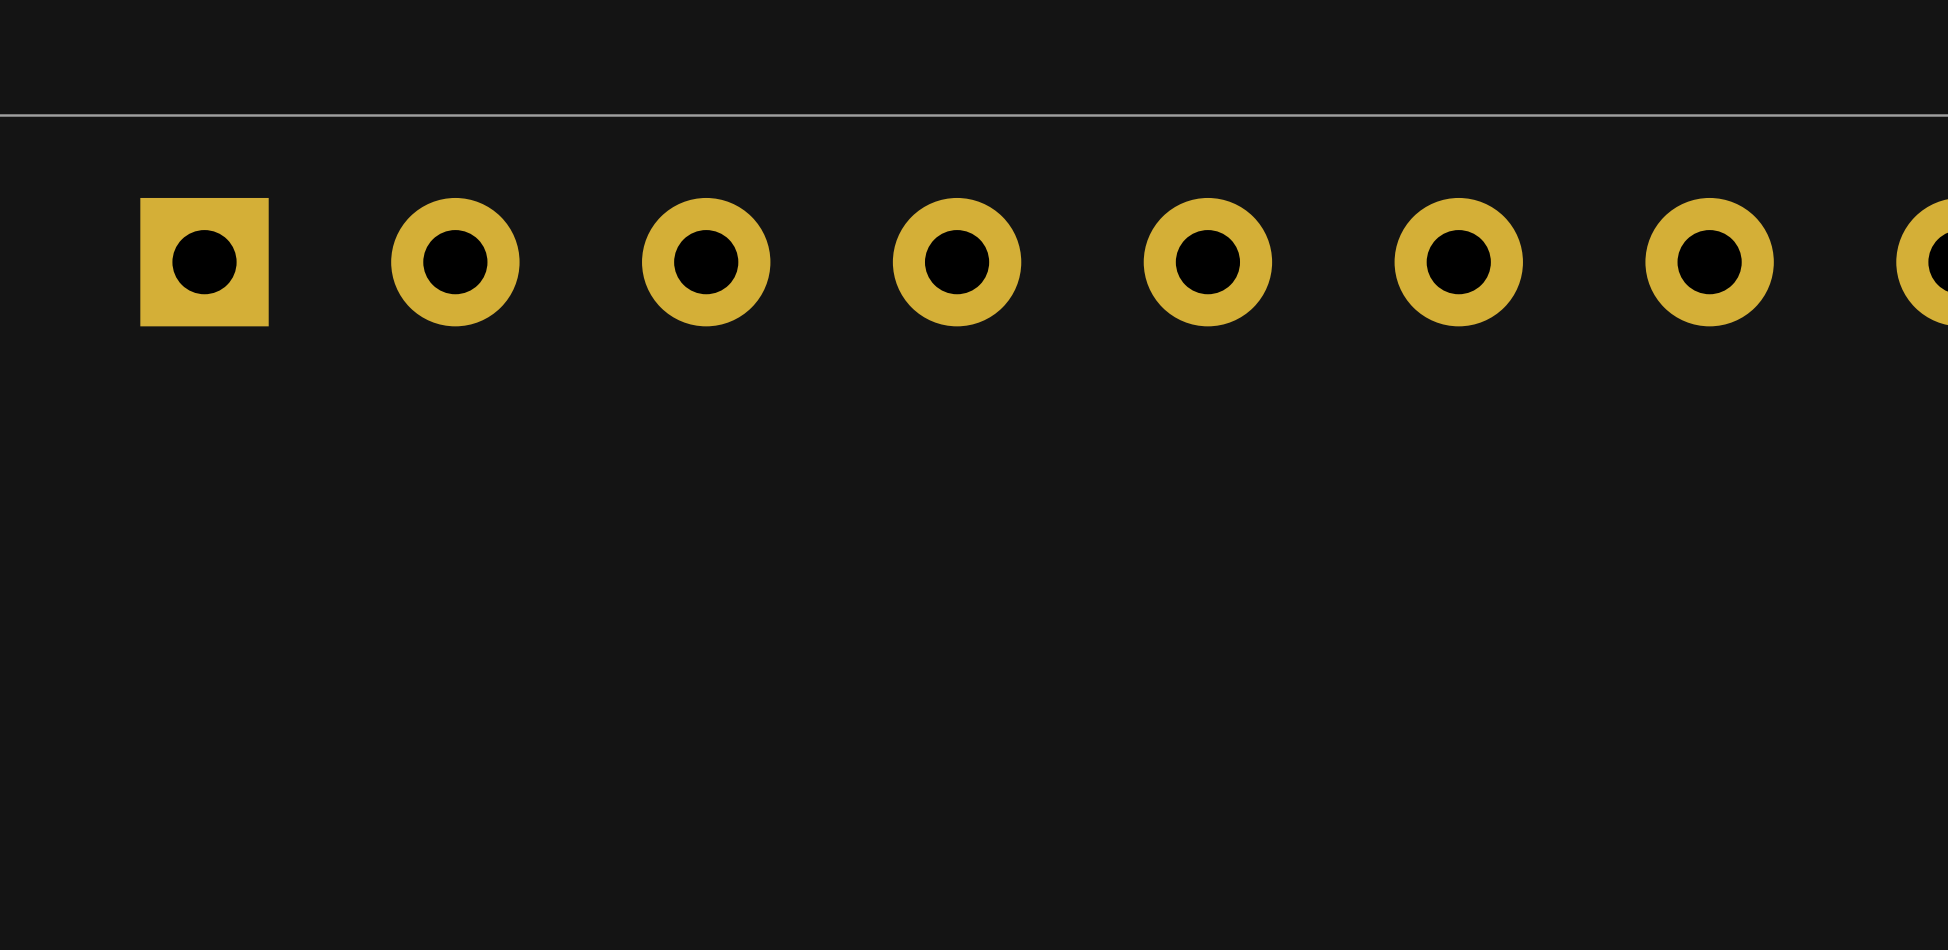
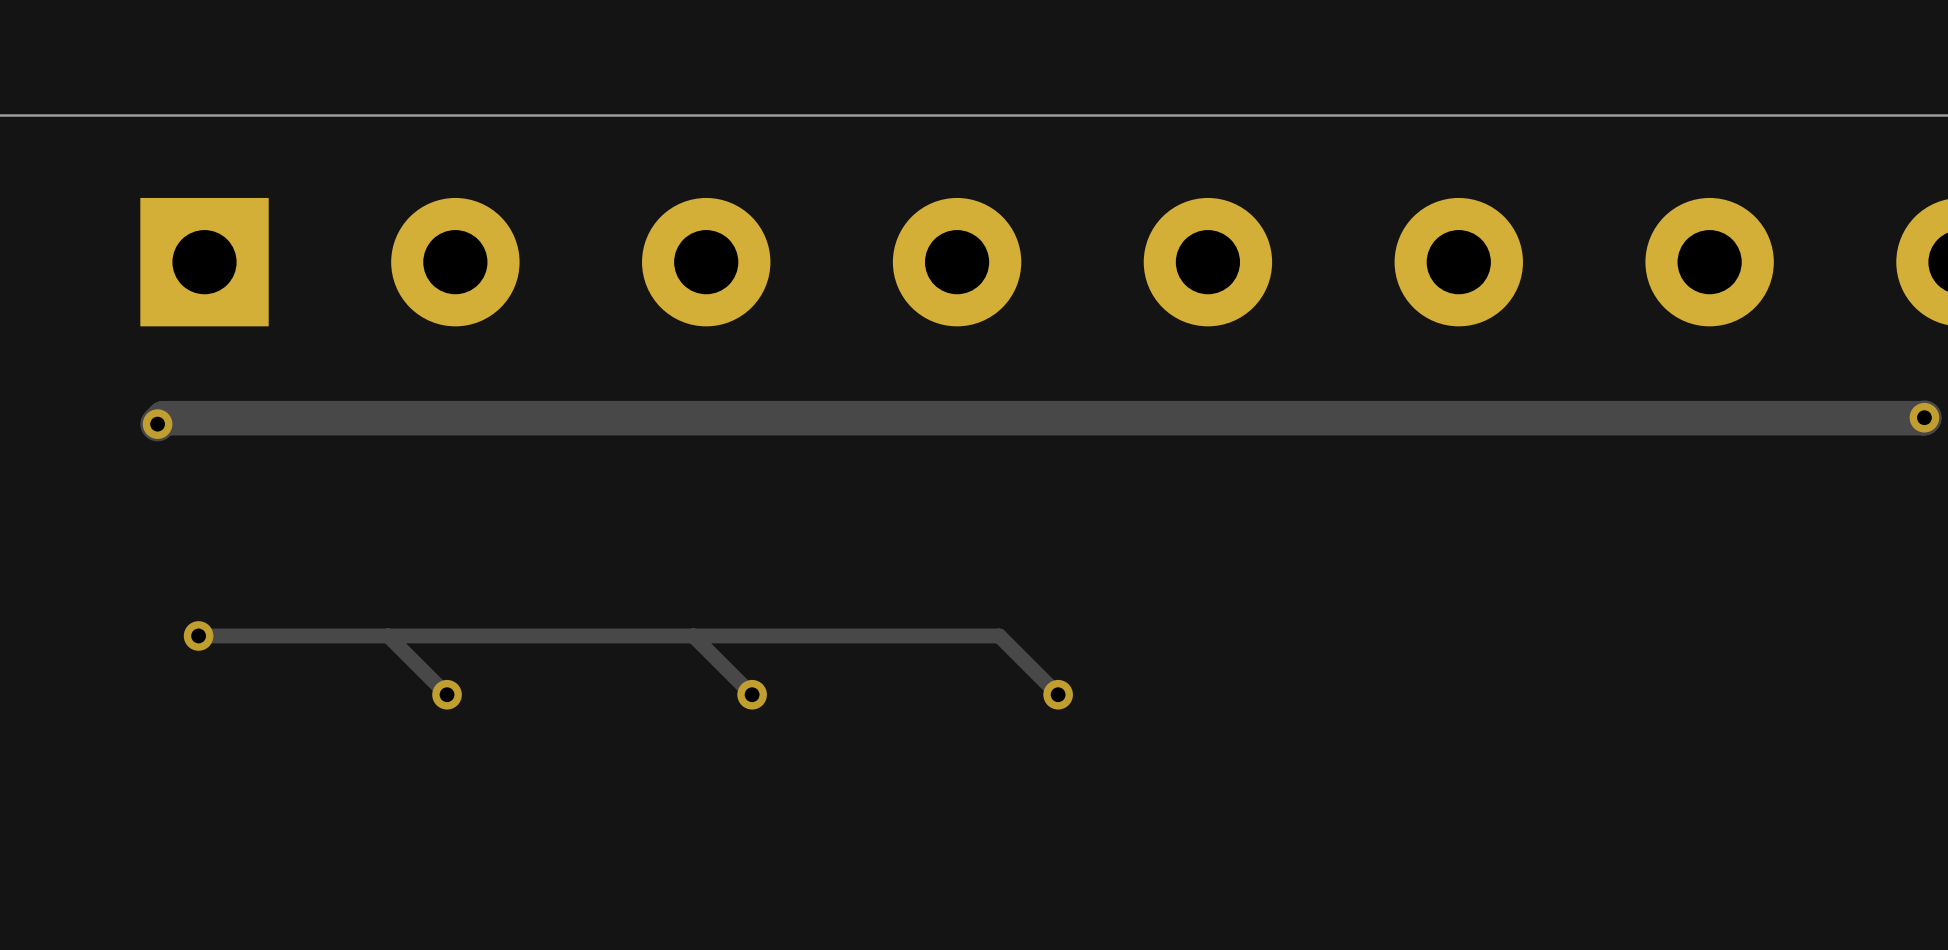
via: none -> (1924, 417)
track: none -> (1923, 418) (163, 418) (157, 424)
via: none -> (157, 424)
track: none -> (198, 635) (999, 635) (1058, 694)
via: none -> (198, 635)
track: none -> (388, 635) (447, 694)
track: none -> (693, 635) (752, 694)
via: none -> (447, 694)
via: none -> (752, 694)
via: none -> (1058, 694)

